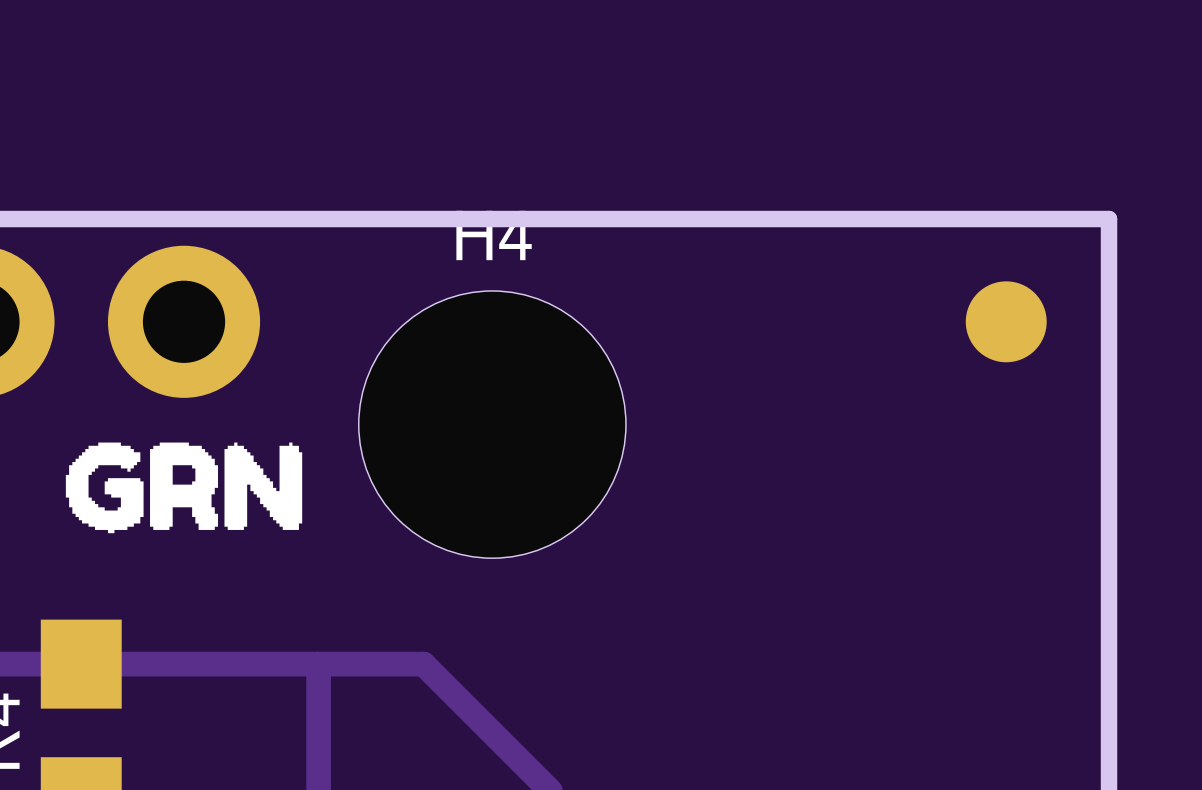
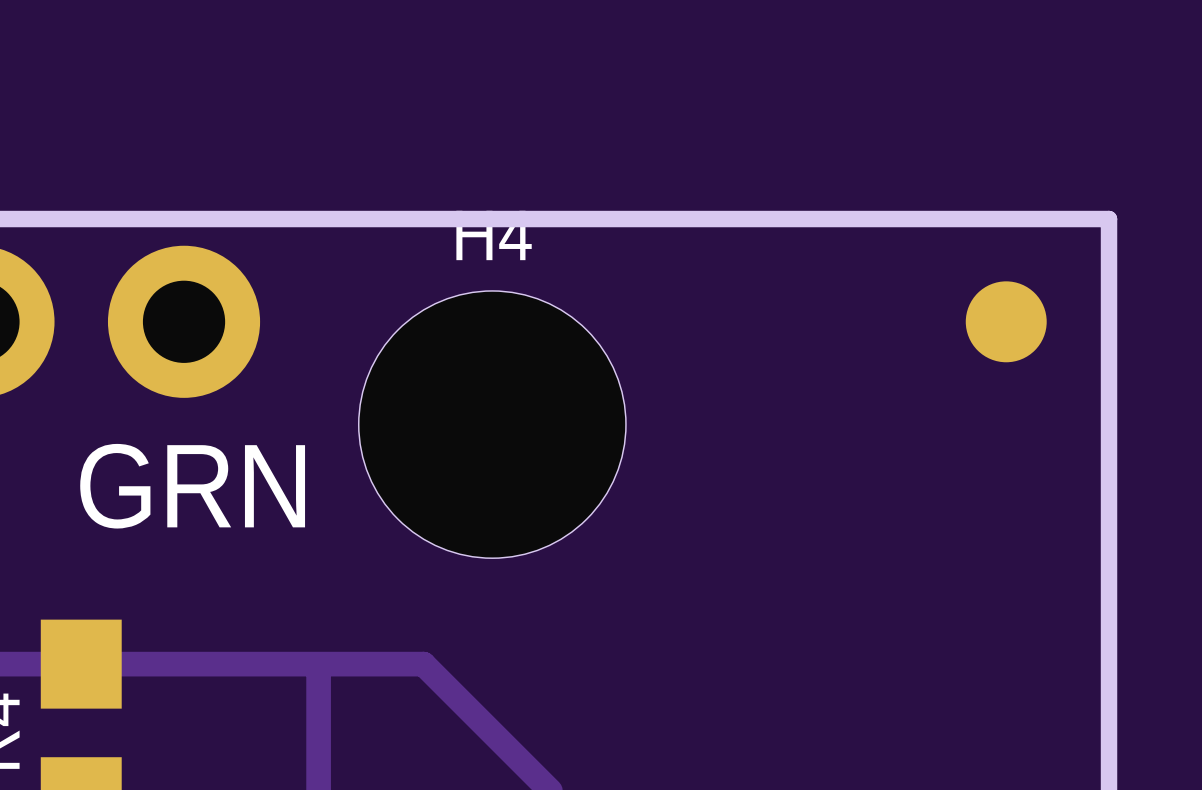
drawing: [65, 442, 303, 534] -> none
text: none -> GRN (192, 486)

